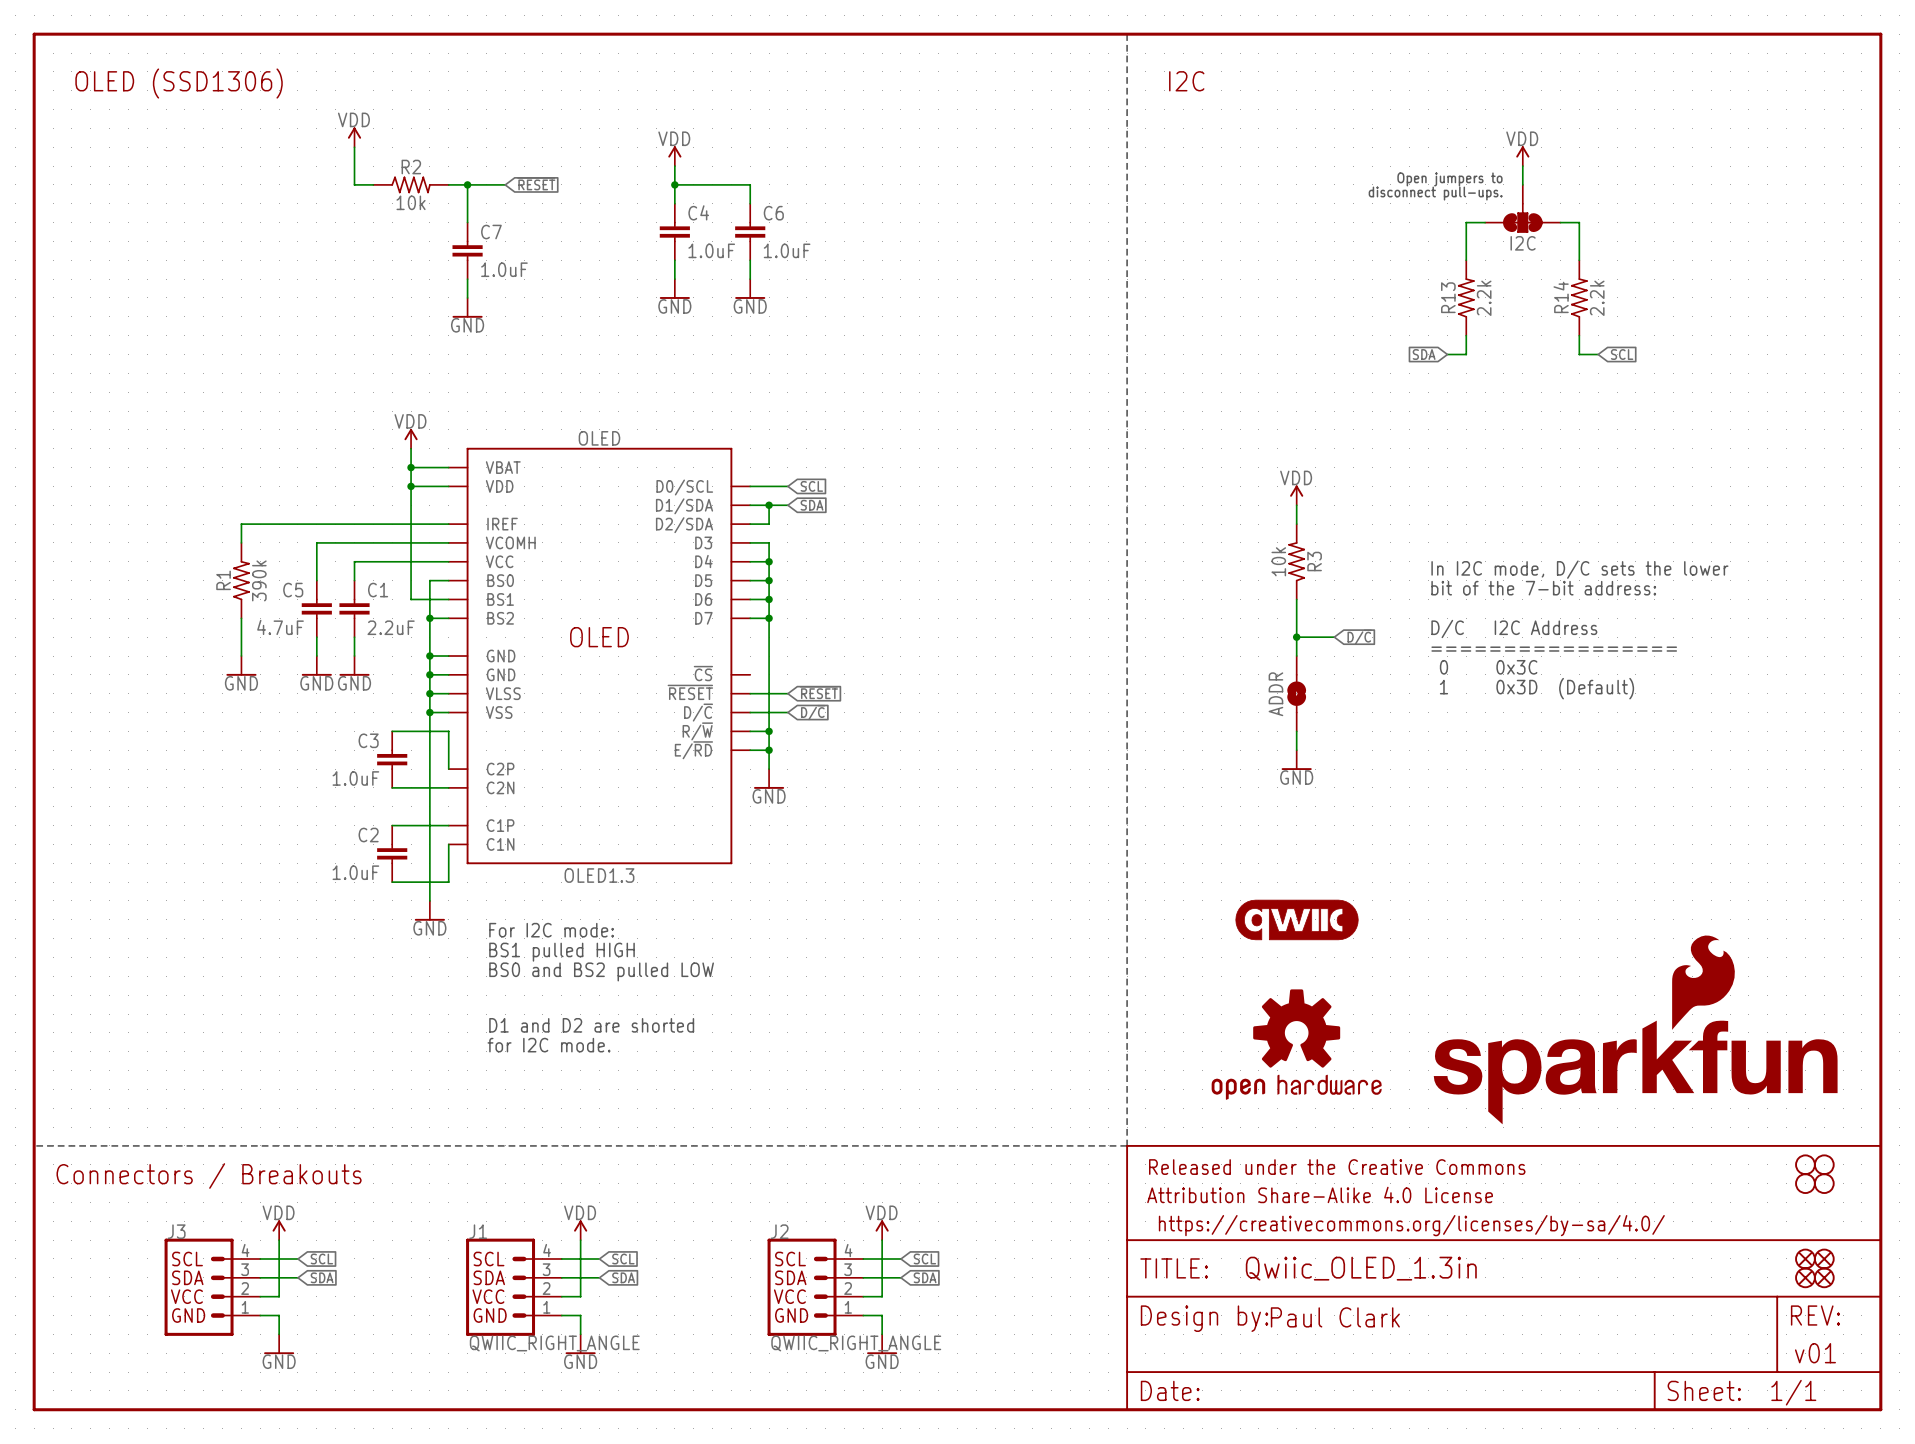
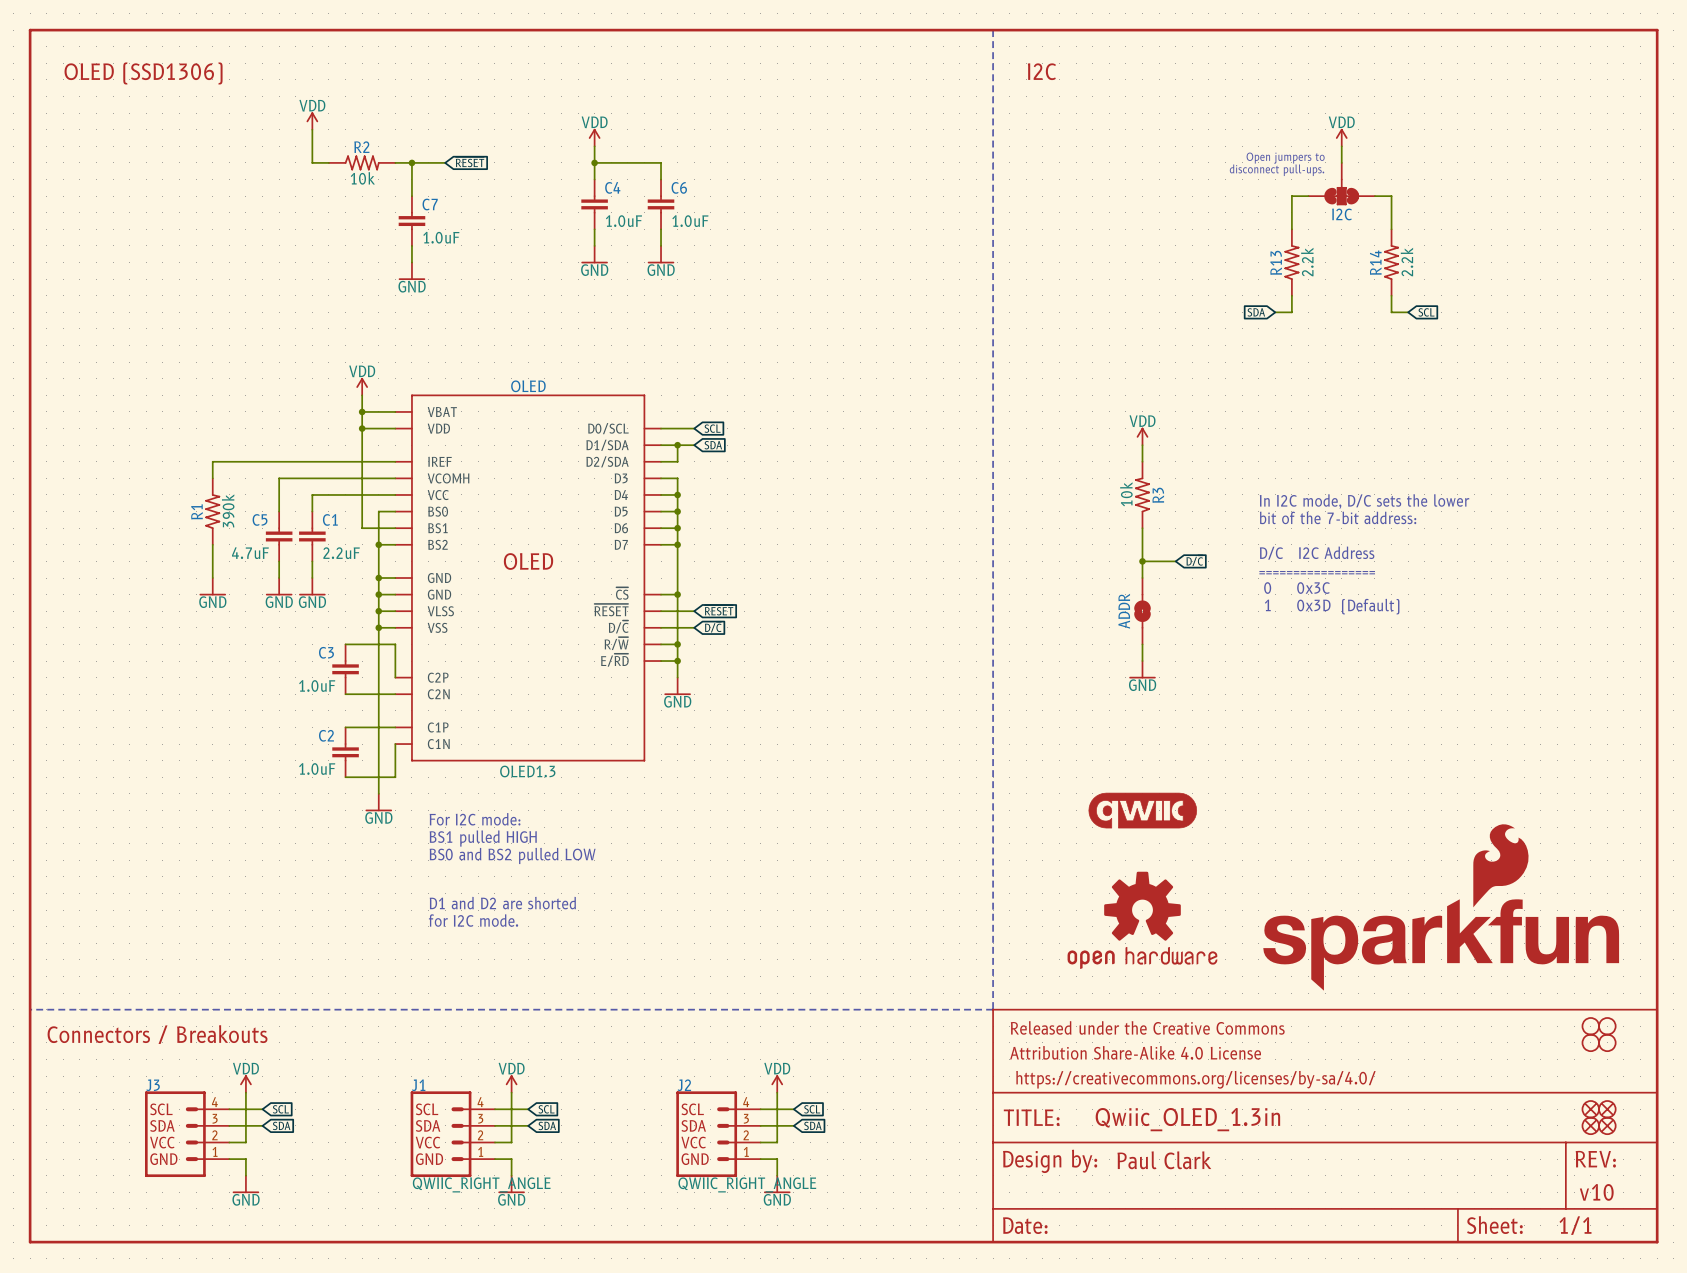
wire: none -> (661, 594) (677, 594)
junction: none -> (677, 594)
text: v01 (1815, 1353) -> v10 (1596, 1192)

